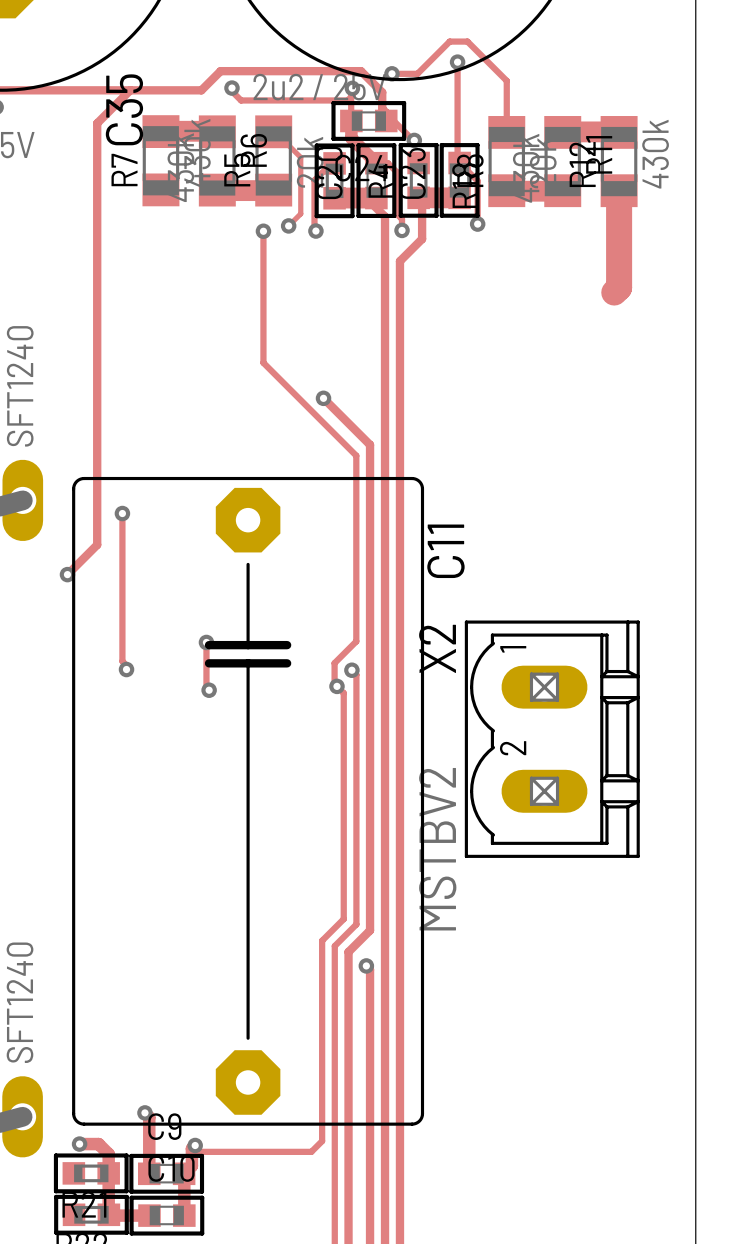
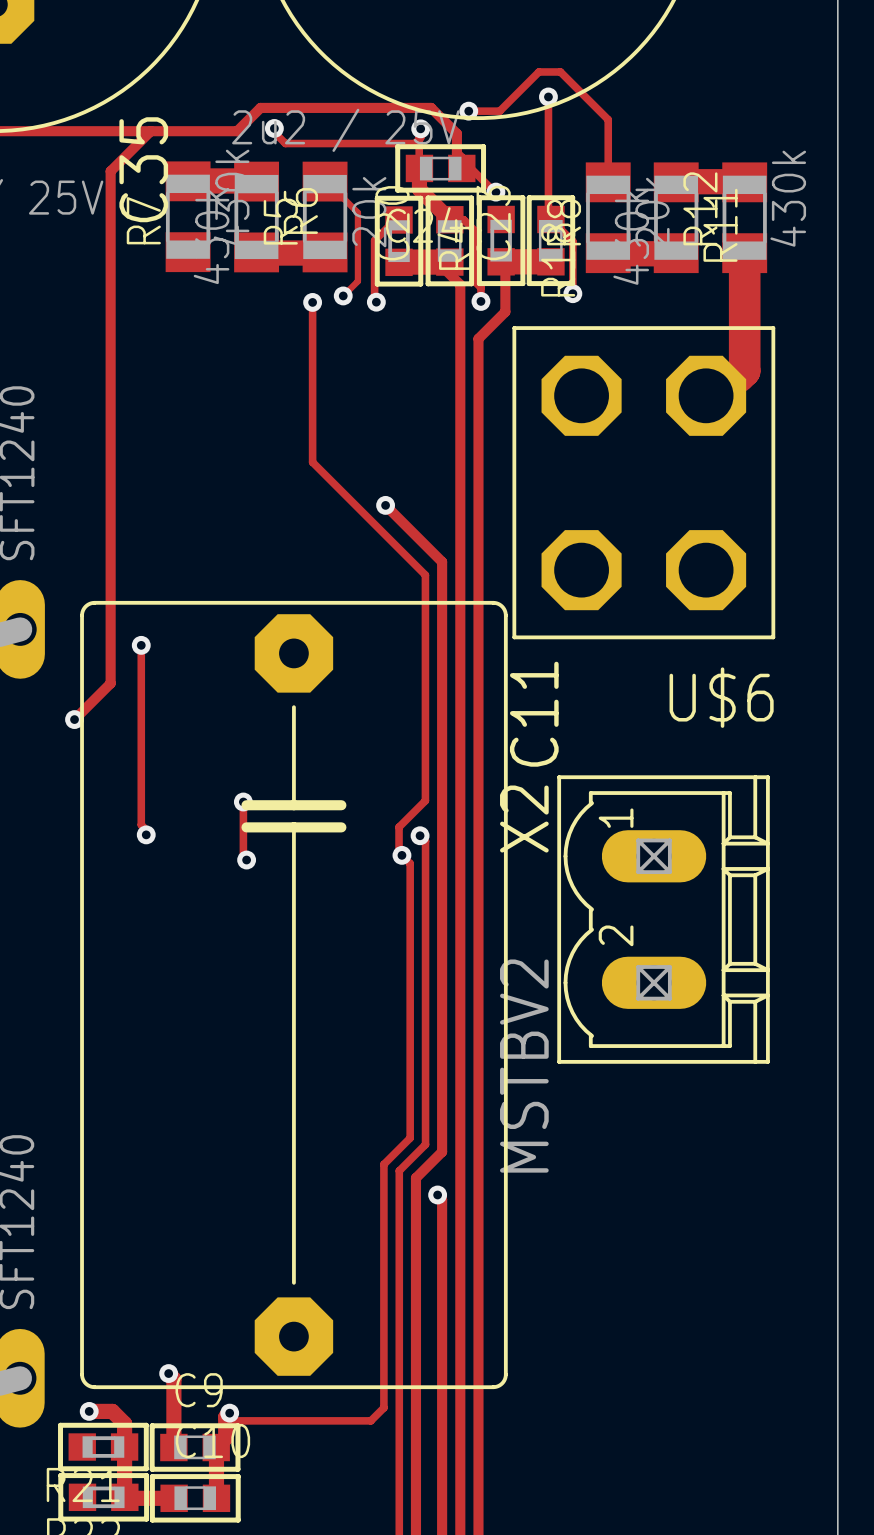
U$6: none -> (643, 482)

